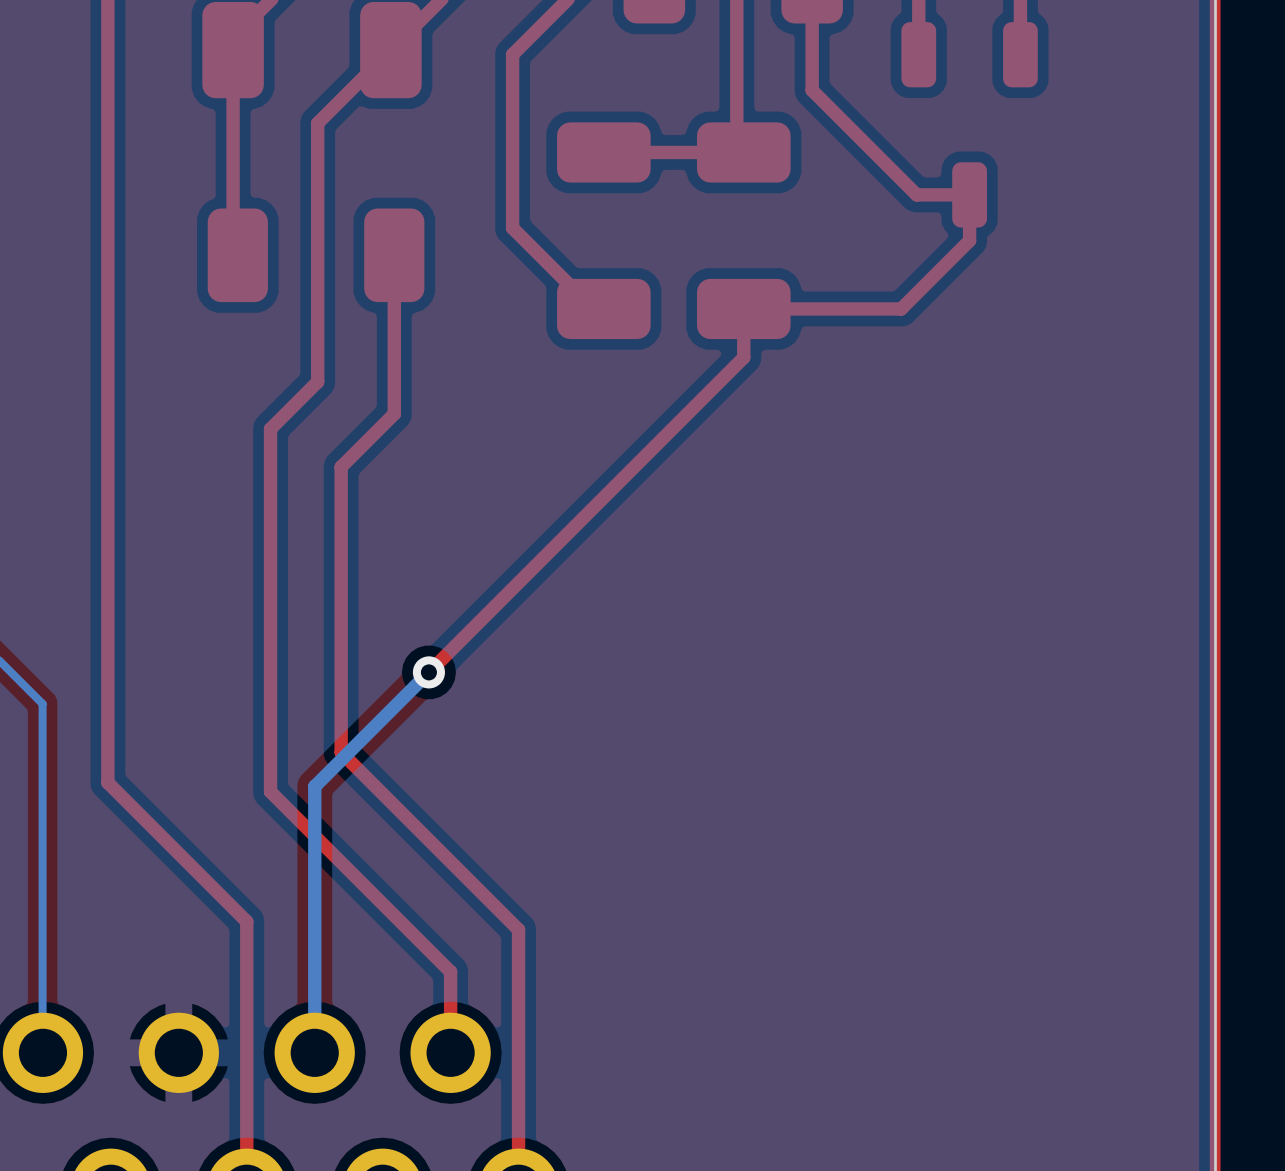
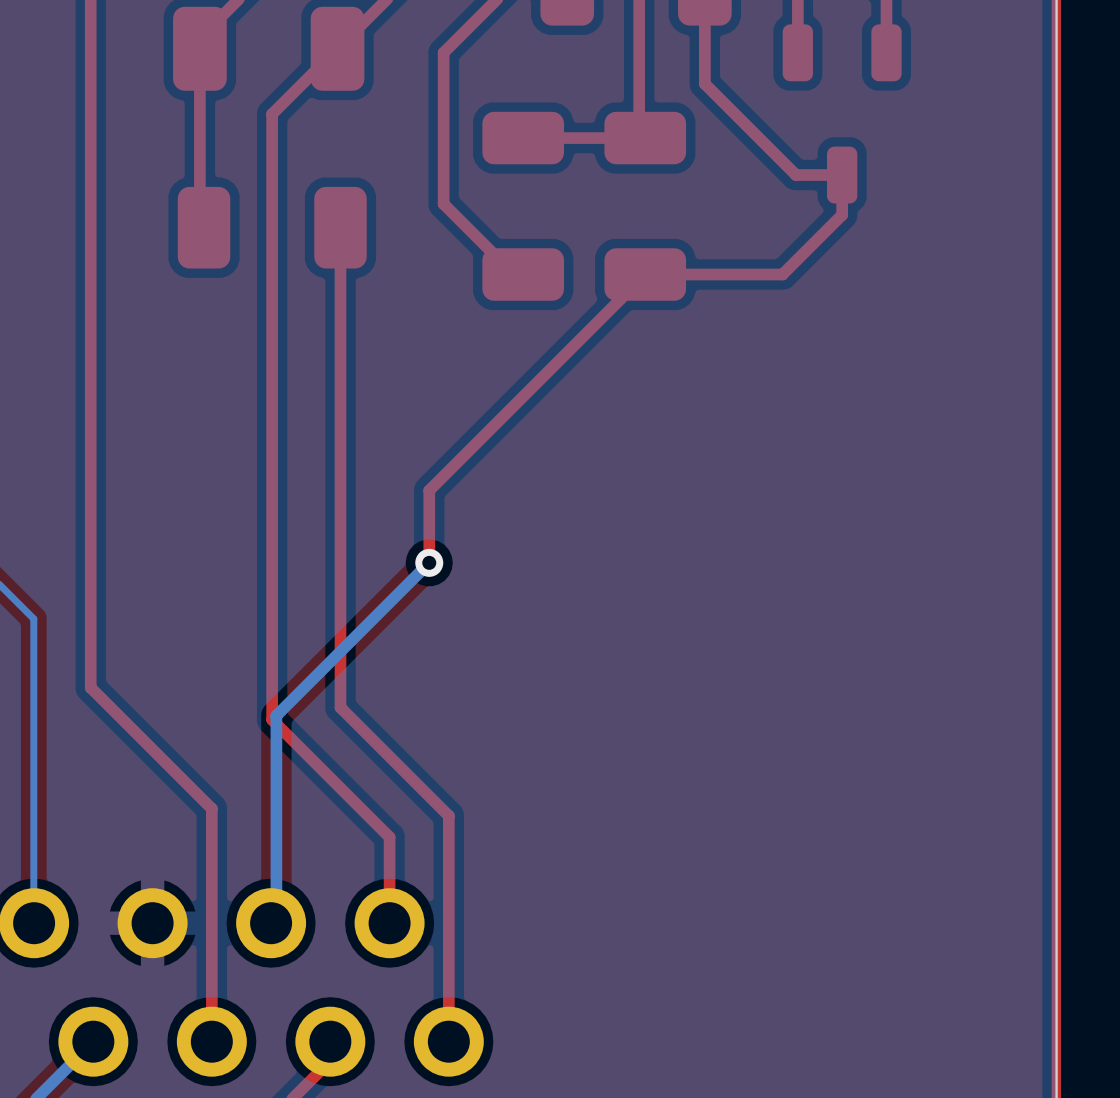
top track: (317, 123) (317, 381) (270, 429) (270, 791) (450, 971) -> (273, 112) (272, 114) (272, 719) (389, 837) (389, 852)
top track: (743, 308) (743, 357) (428, 672) -> (645, 274) (429, 490) (429, 562)
top track: (394, 413) (341, 467) (341, 752) (394, 805) -> (340, 366) (340, 707)
bottom track: none -> (427, 564) (276, 715) (276, 928)
bottom track: (428, 672) (314, 786) (314, 1055) -> none
via position: (428, 672) -> (429, 562)

